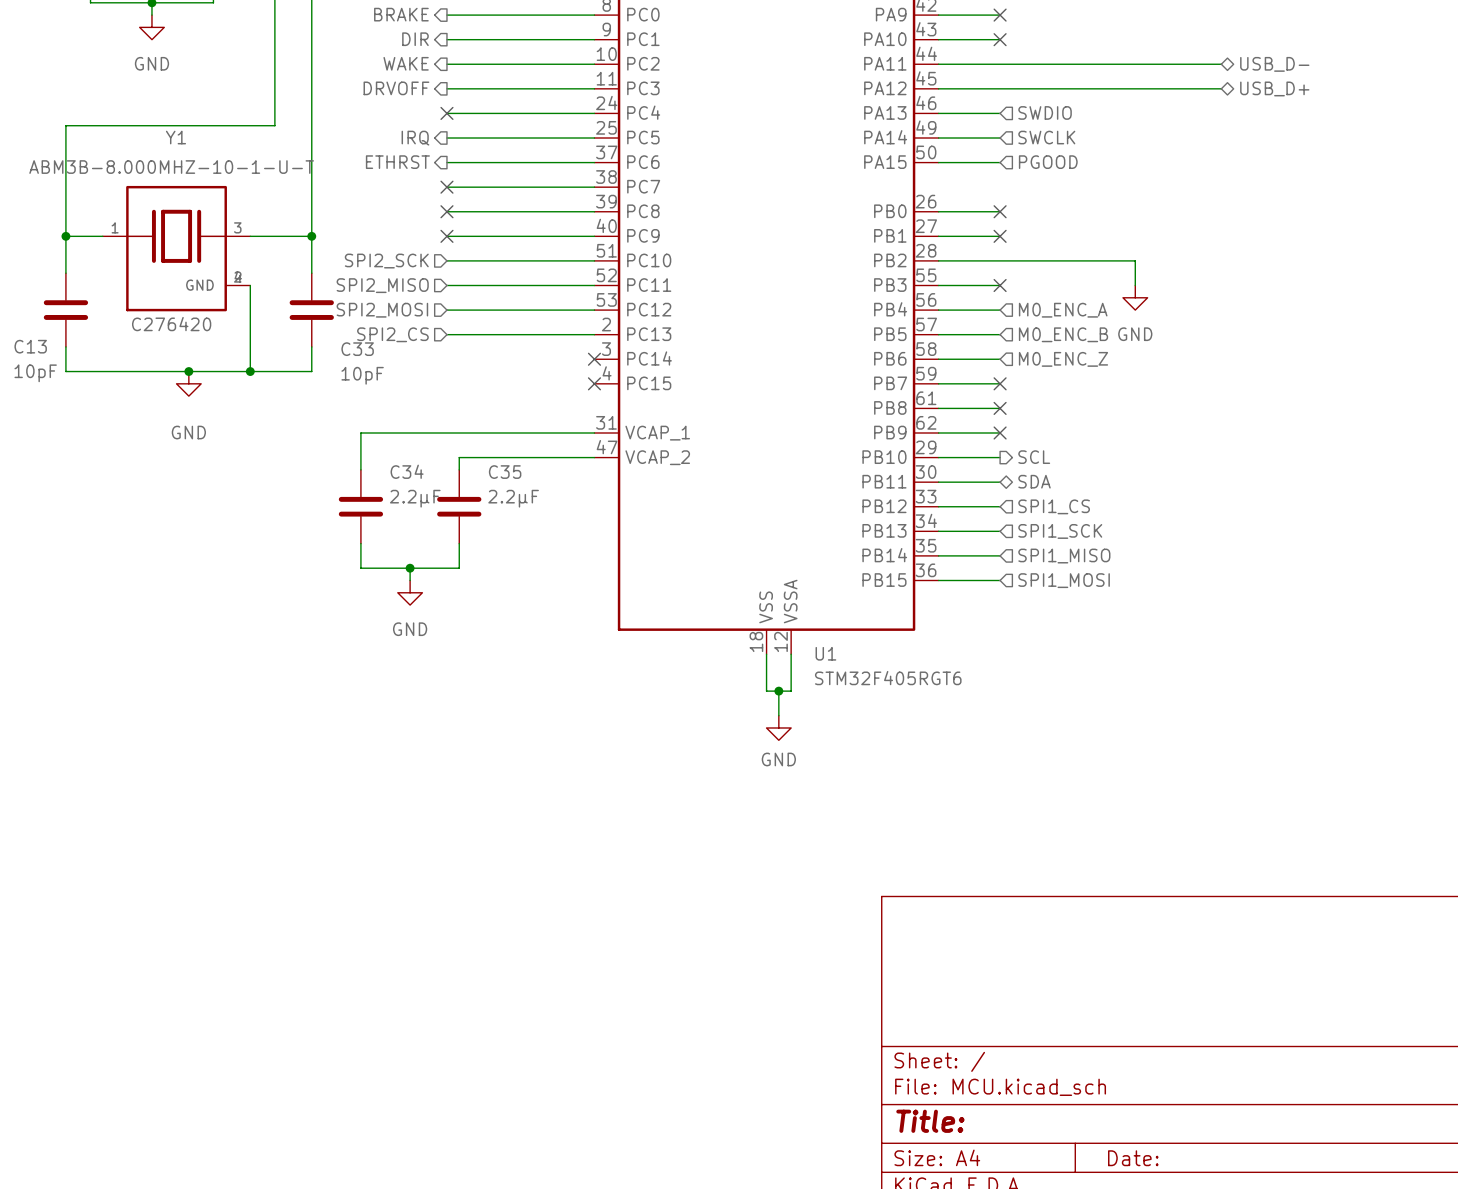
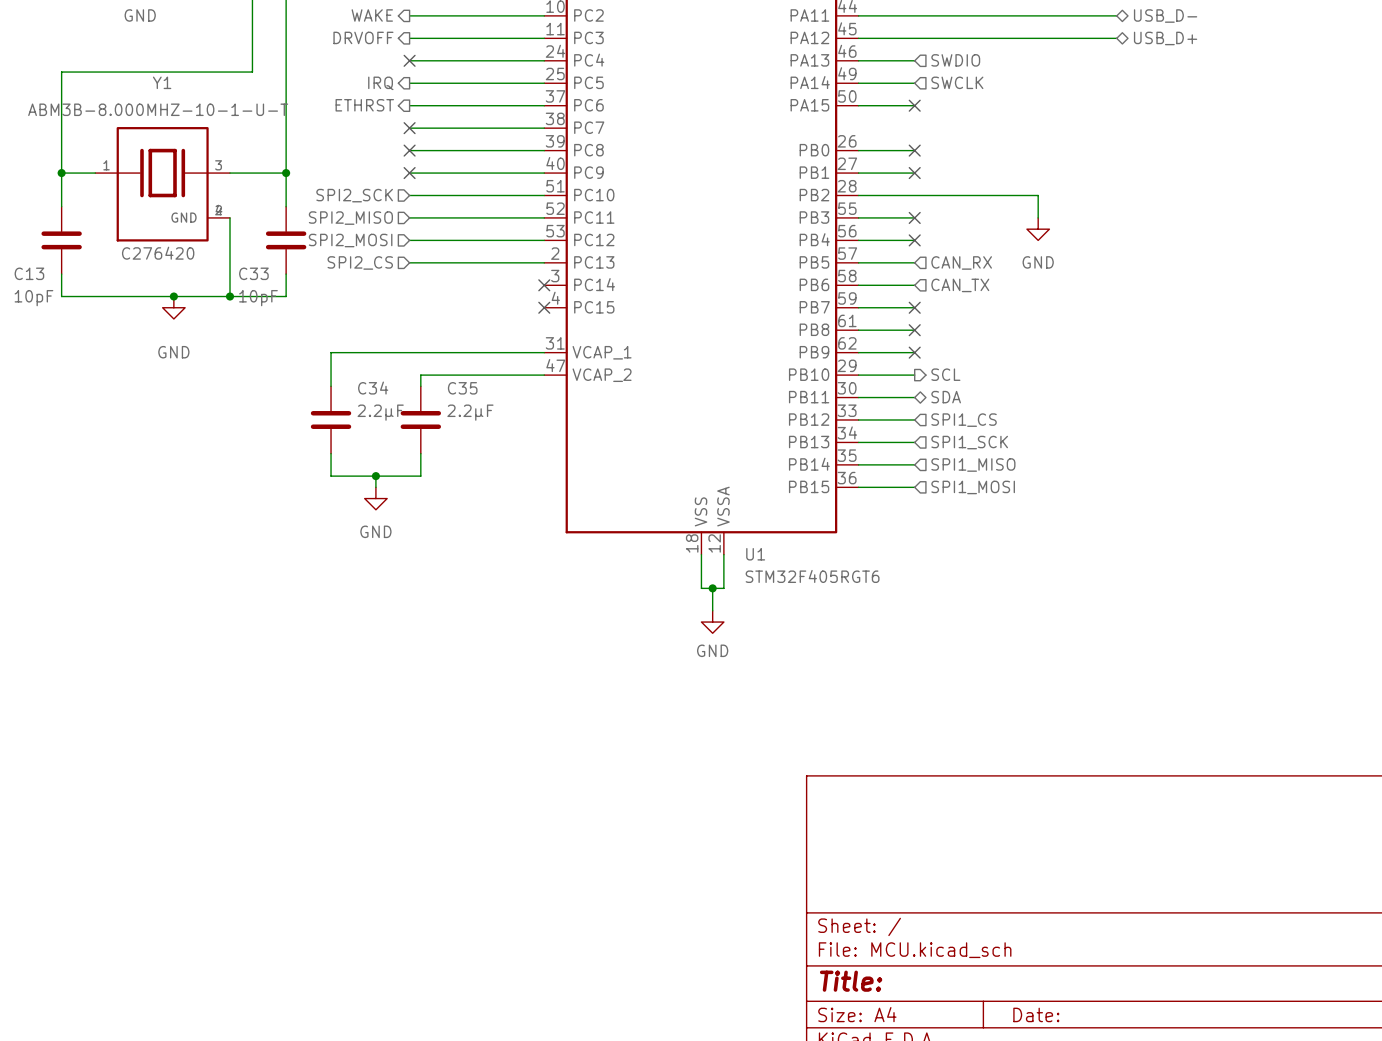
no-connect mark: none -> (914, 105)
hierarchical label: PGOOD (1048, 162) -> none
no-connect mark: none -> (914, 240)
hierarchical label: M0_ENC_A (1063, 310) -> none
hierarchical label: M0_ENC_B (1063, 334) -> CAN_RX (961, 262)
C33 name position: C33 (357, 349) -> C33 (253, 273)
hierarchical label: M0_ENC_Z (1063, 359) -> CAN_TX (960, 285)
C33 value position: 10pF (362, 375) -> 10pF (258, 298)

